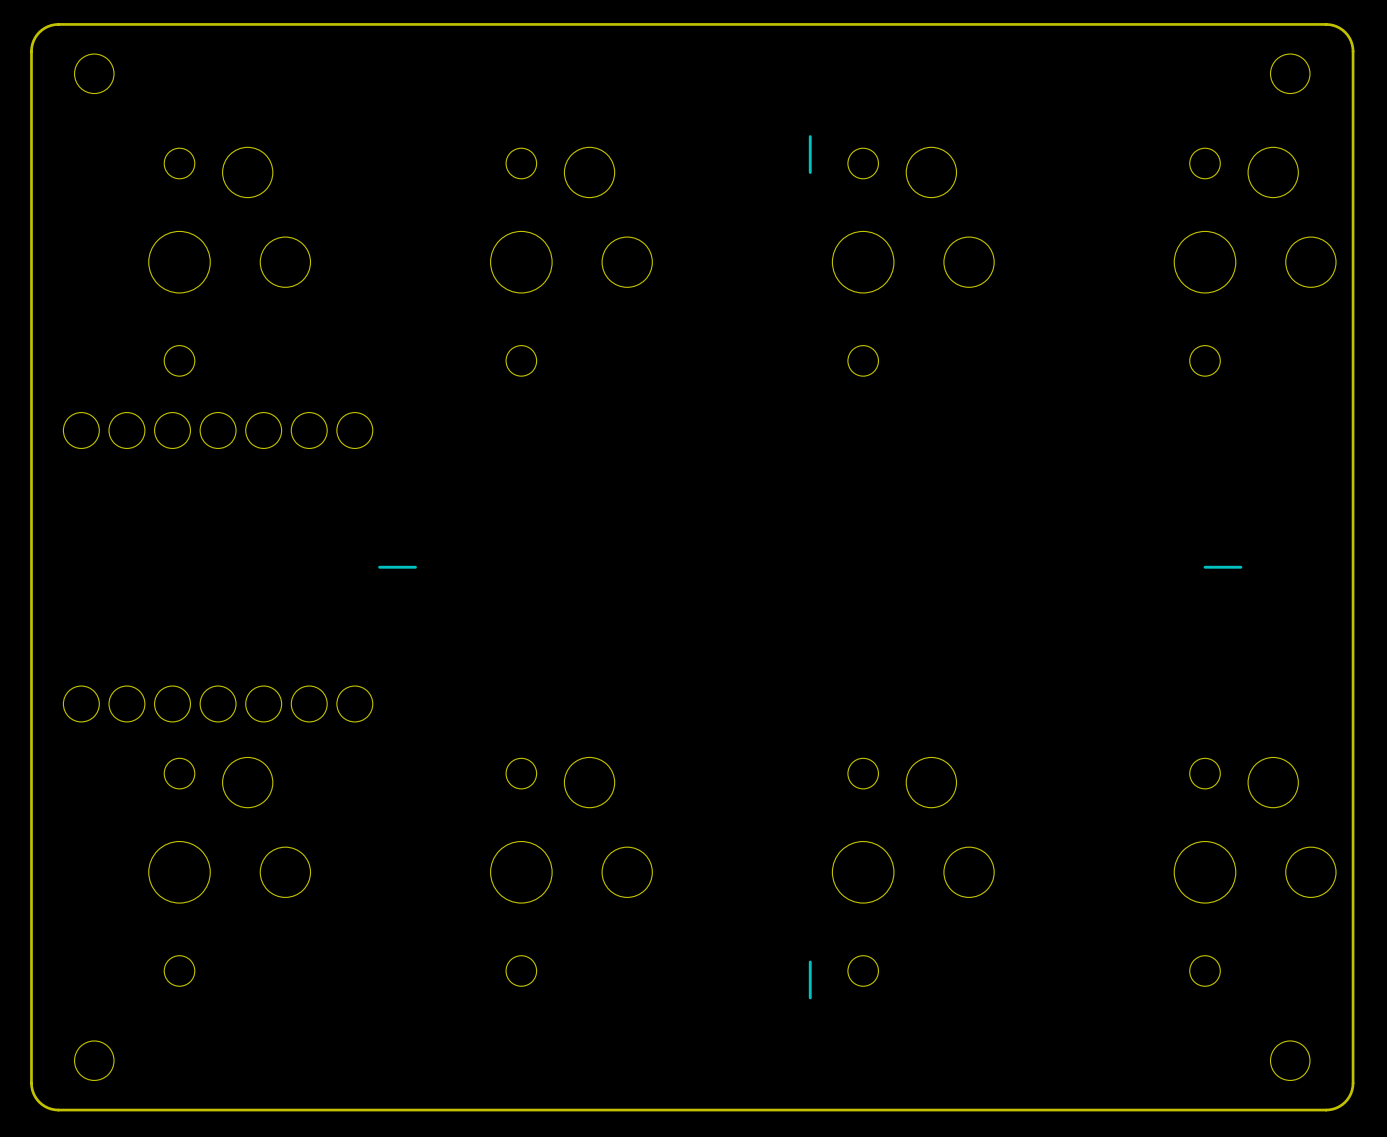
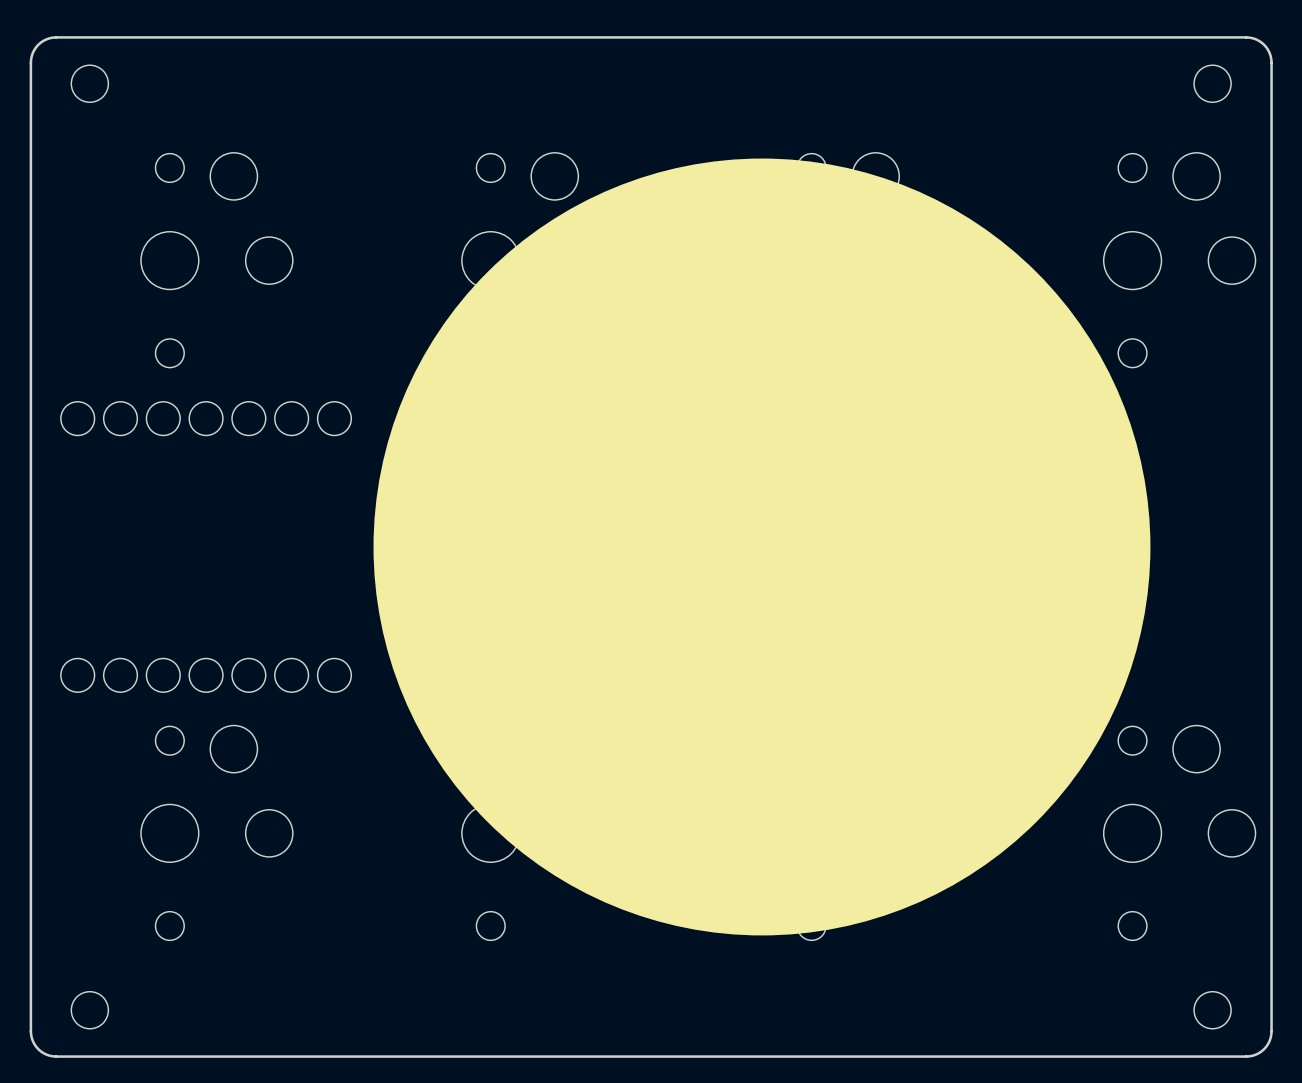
line: (810, 136) (810, 172) -> none
drawing: none -> [373, 158, 1151, 936]
line: (415, 567) (379, 567) -> none
line: (1240, 567) (1205, 567) -> none
line: (810, 962) (810, 997) -> none

